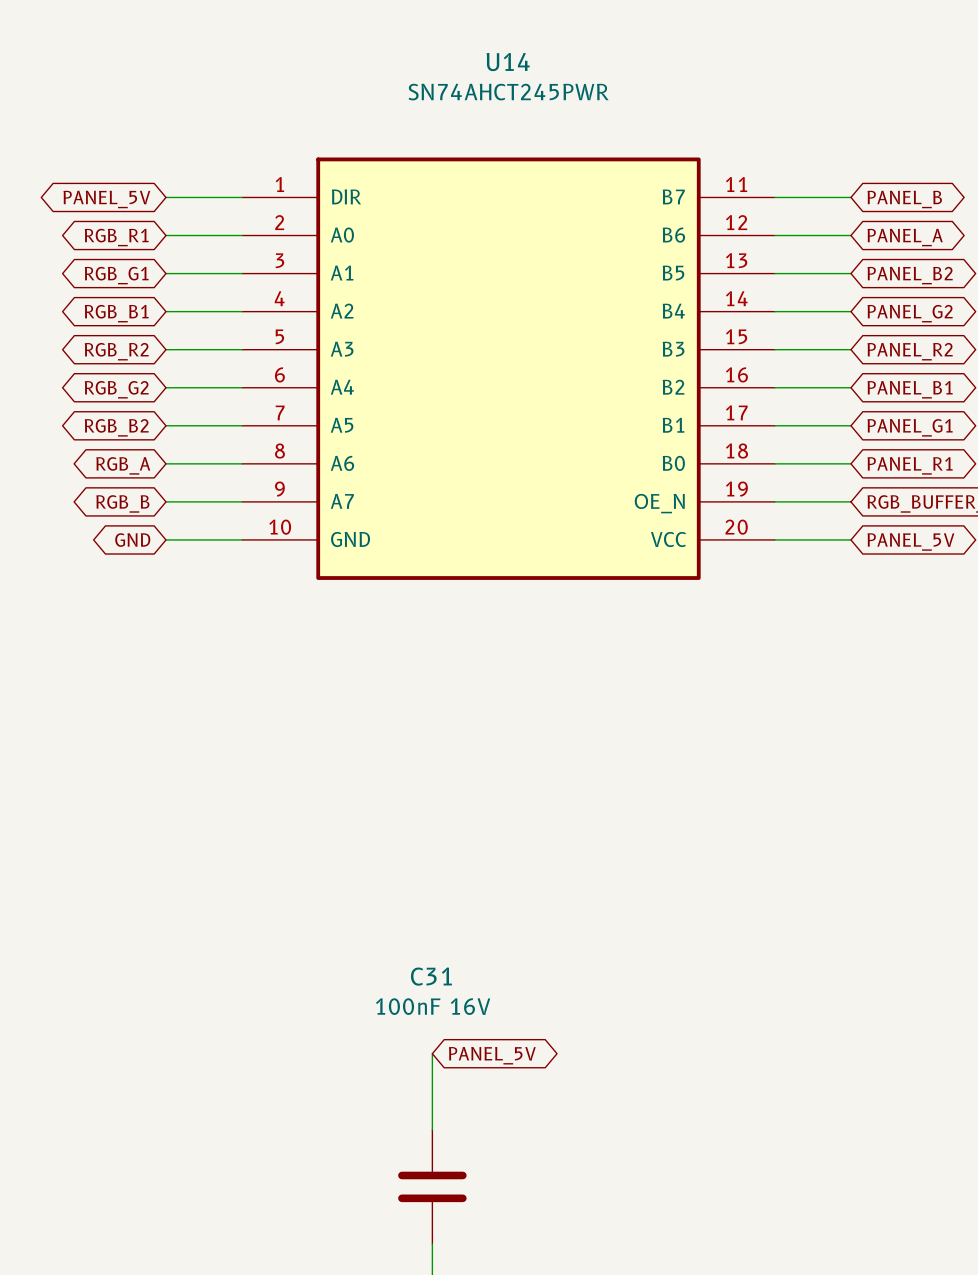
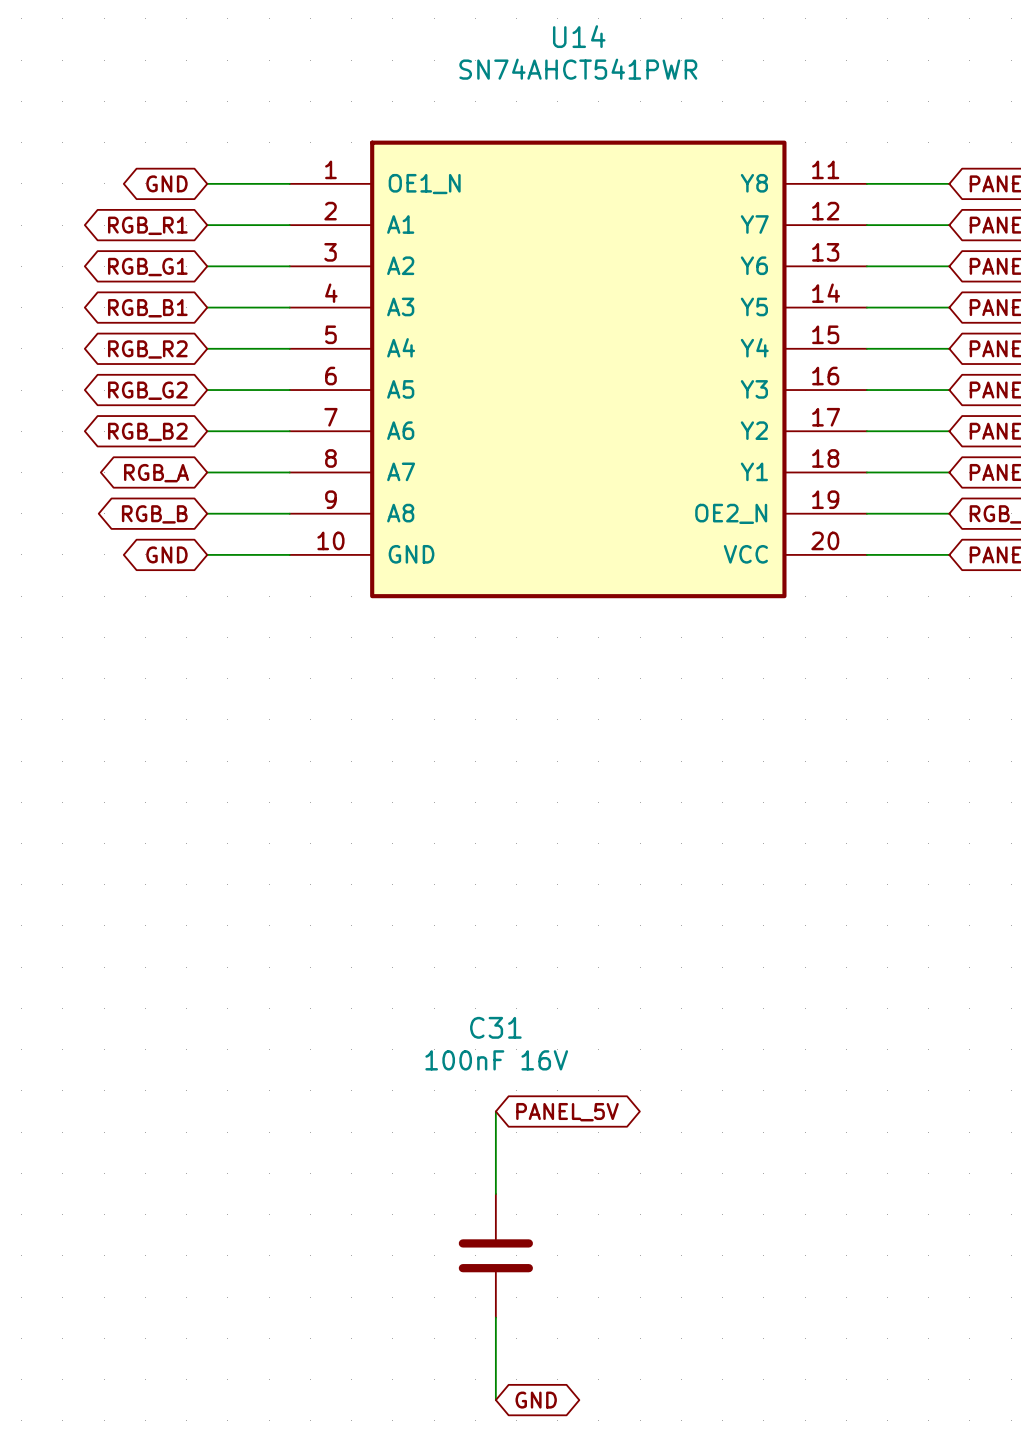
U14 value: SN74AHCT245PWR (508, 92) -> SN74AHCT541PWR (578, 69)
U14 symbol: [242, 157, 775, 580] -> [289, 140, 867, 599]
global label: PANEL_5V (106, 199) -> GND (166, 183)

